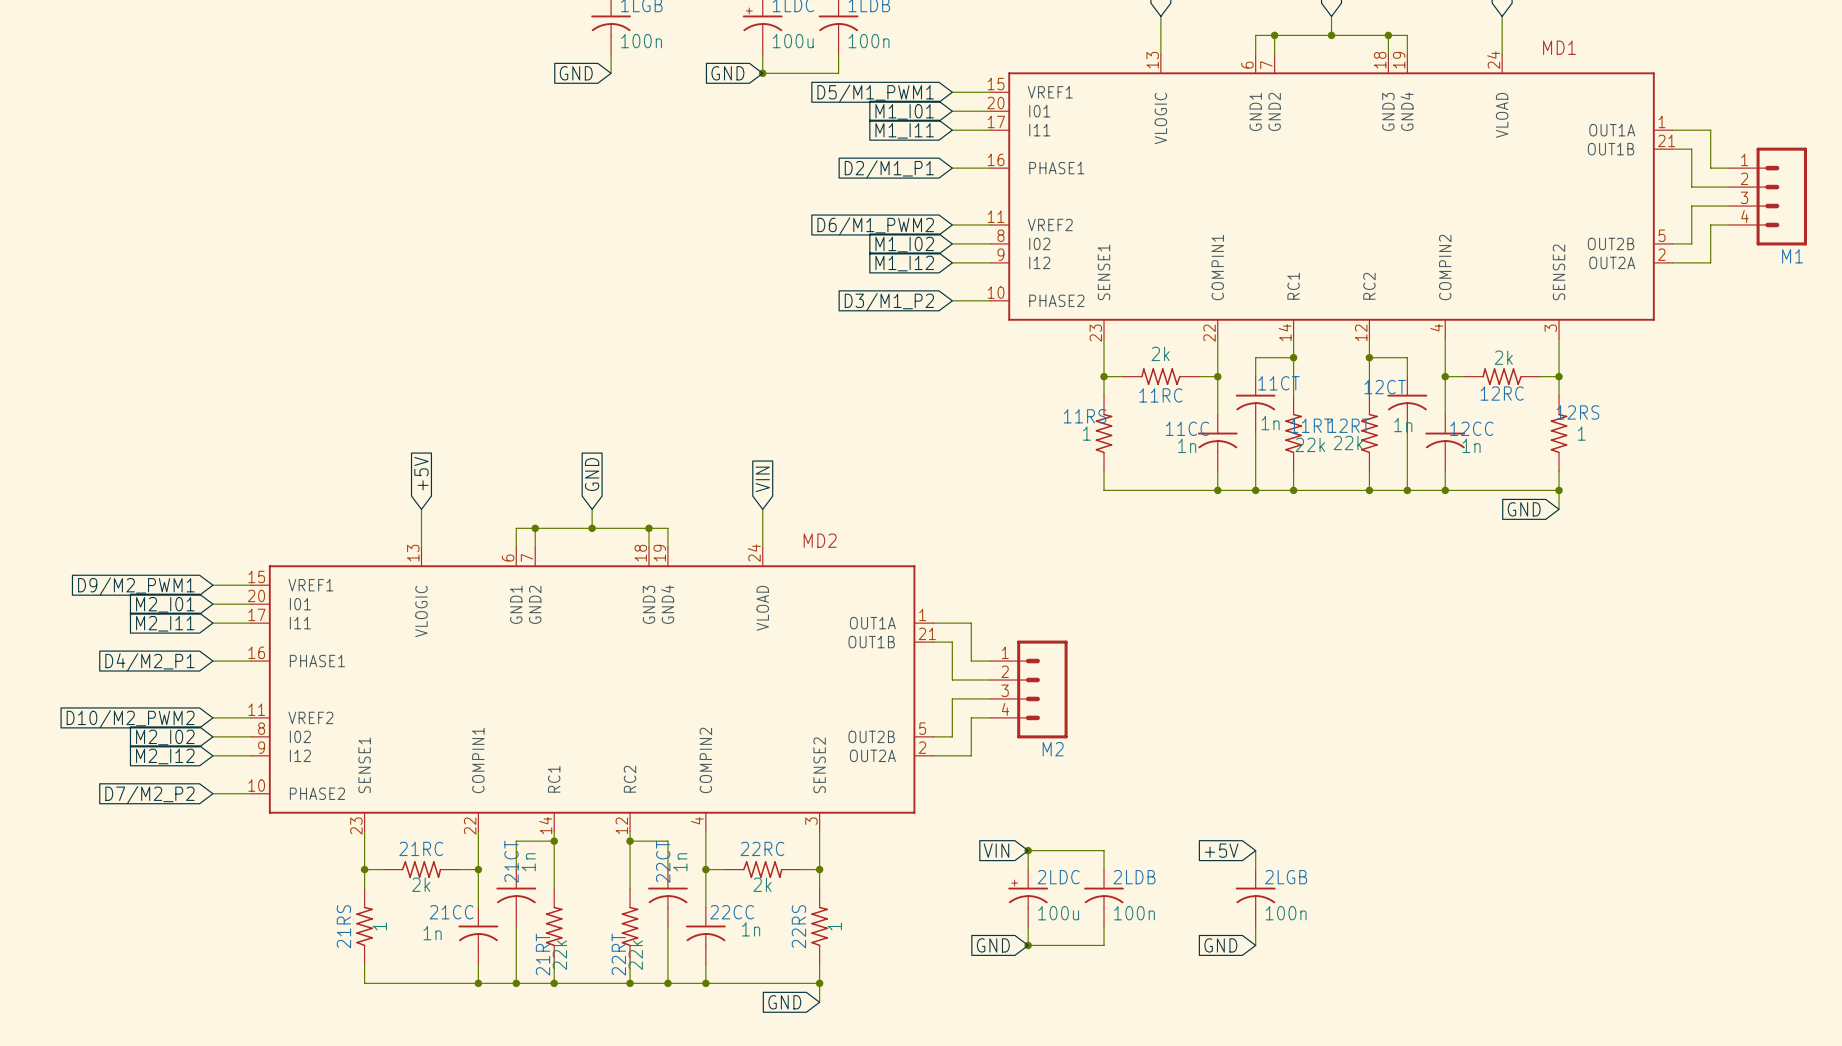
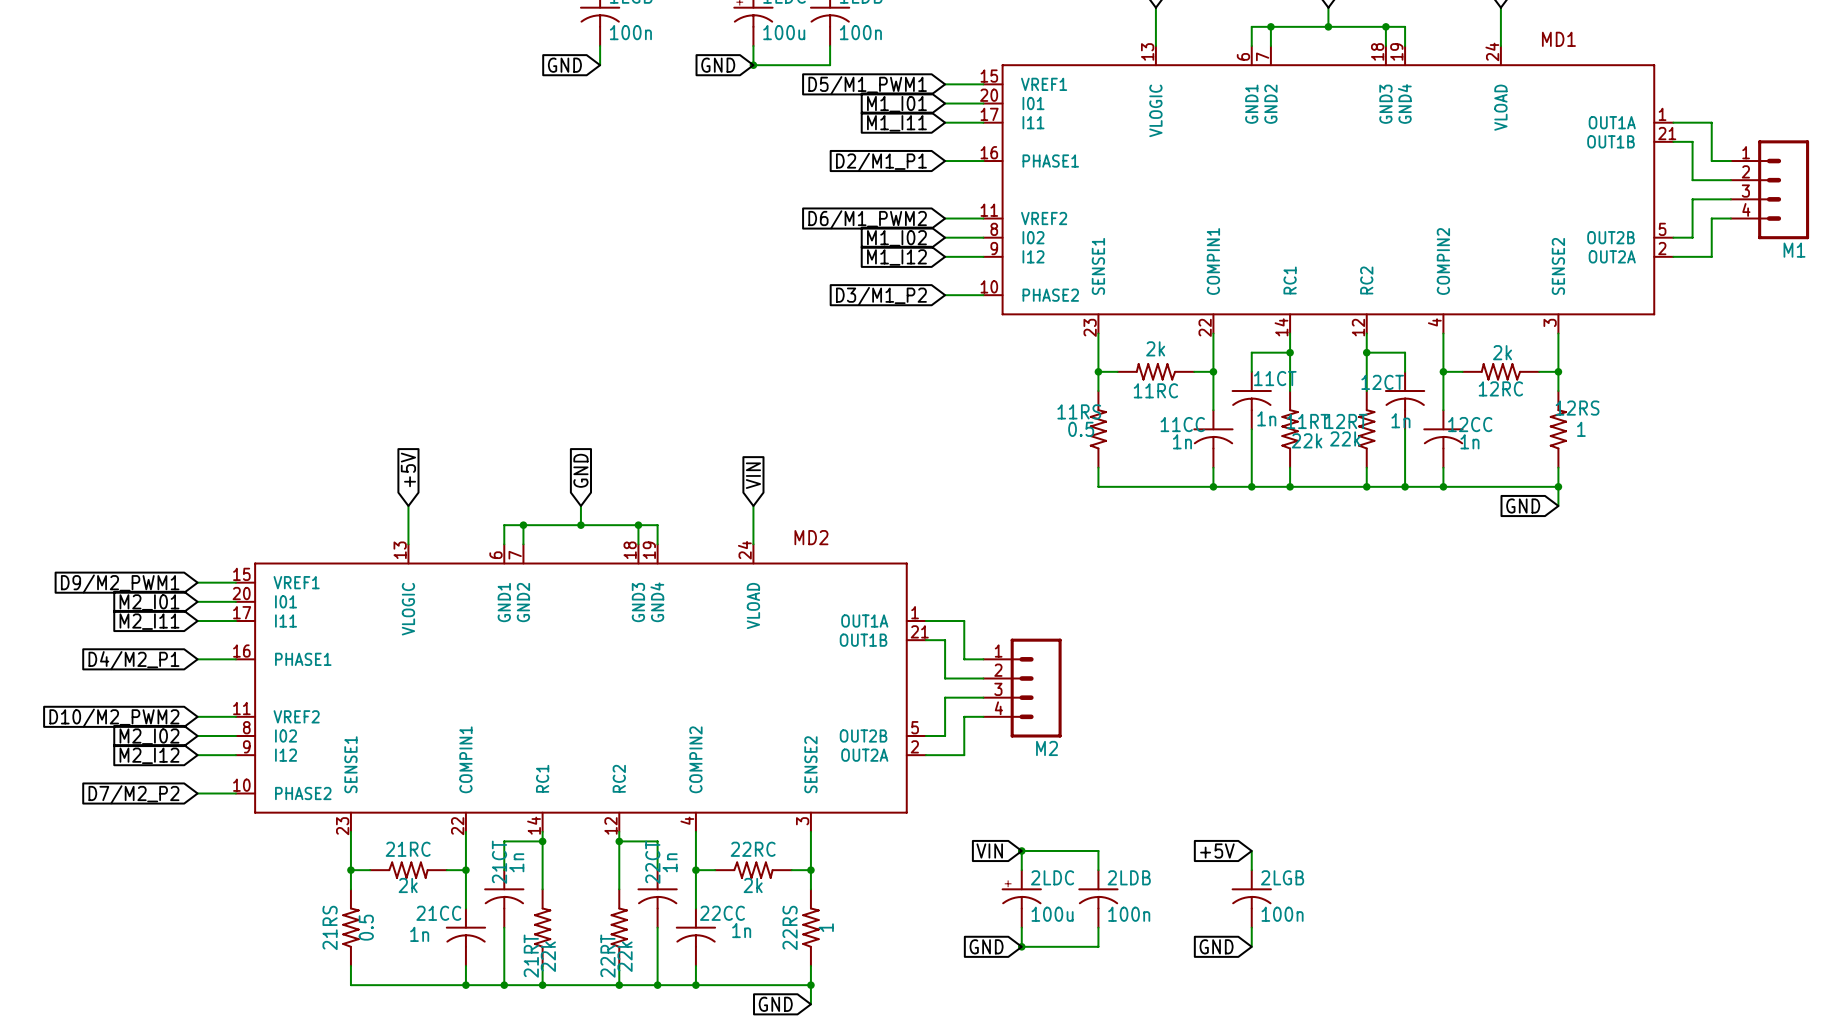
11RS value: 1 (1086, 433) -> 0.5 (1081, 429)
21RS value: 1 (379, 926) -> 0.5 (366, 927)

